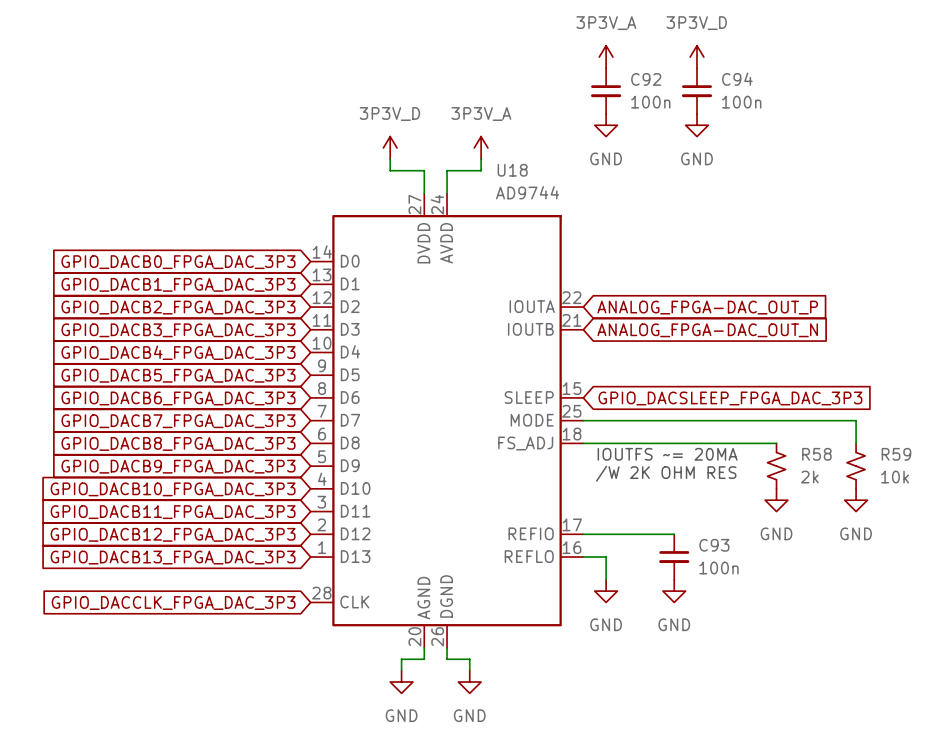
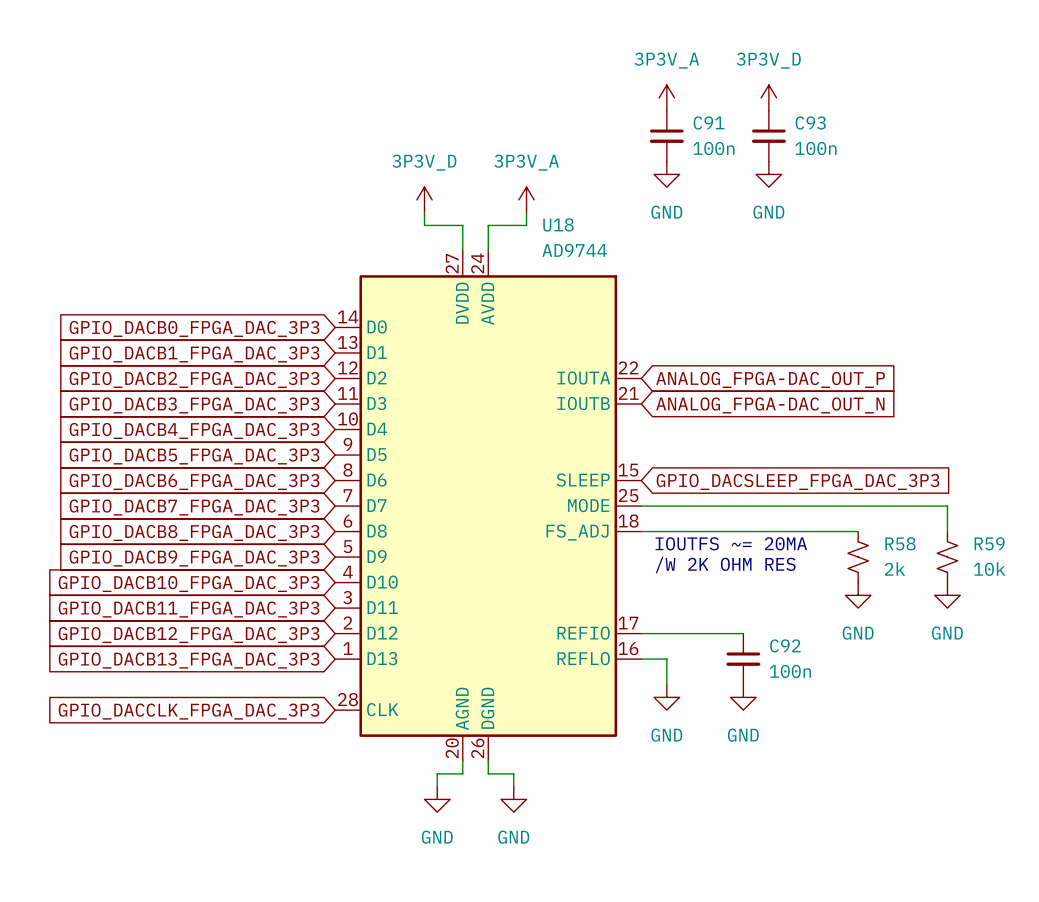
C92 name: C92 (646, 79) -> C91 (709, 122)
C94 name: C94 (737, 79) -> C93 (810, 122)
C93 name: C93 (714, 545) -> C92 (785, 645)

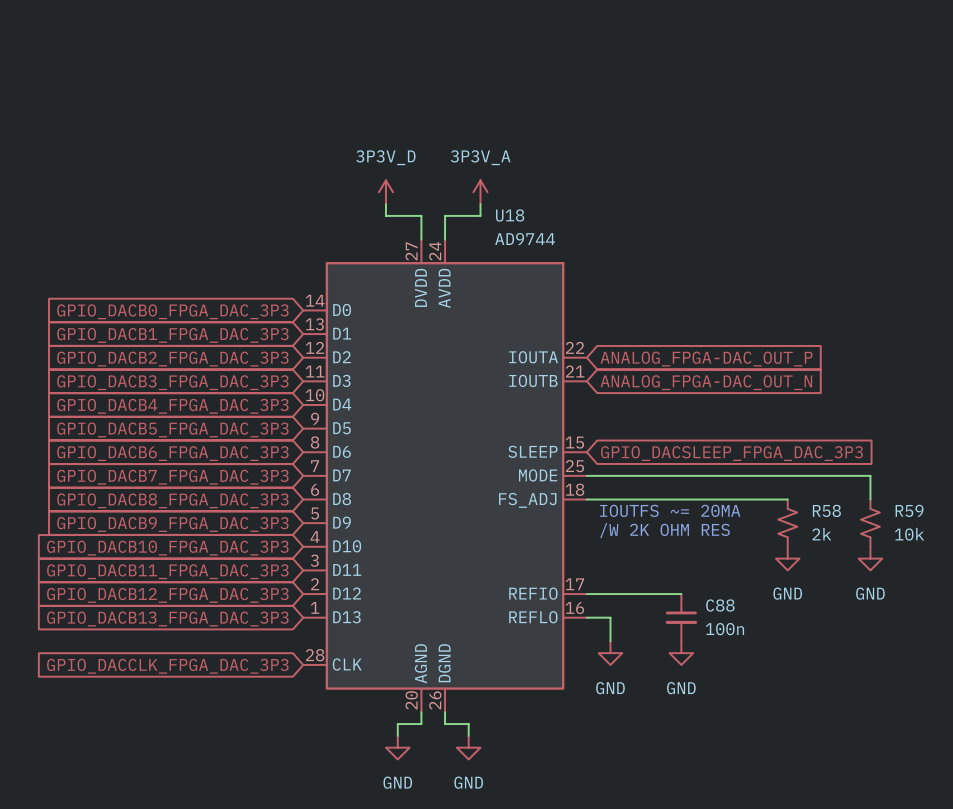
power symbol: 3P3V_A (666, 97) -> none
power symbol: 3P3V_D (768, 97) -> none
C91: 100n (666, 136) -> none
C93: 100n (768, 136) -> none
power symbol: GND (666, 174) -> none
power symbol: GND (768, 174) -> none
C92 name: C92 (785, 645) -> C88 (720, 605)

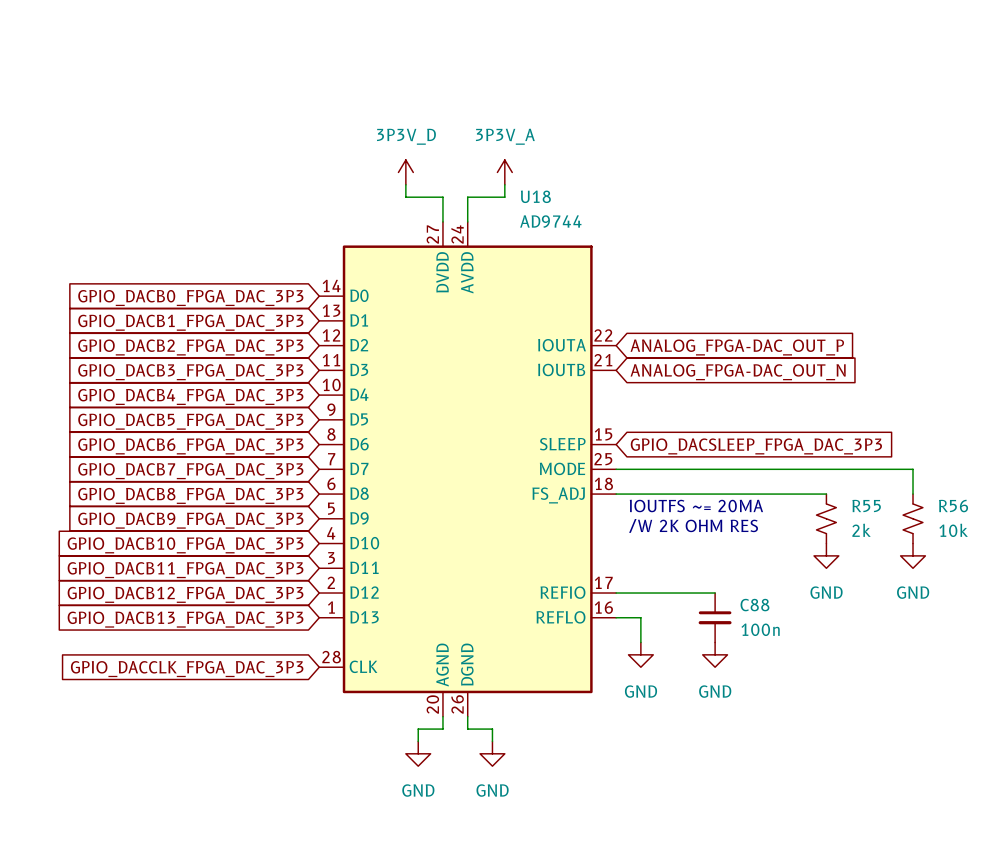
R58 name: R58 (826, 510) -> R55 (866, 505)
R59 name: R59 (909, 510) -> R56 (953, 506)

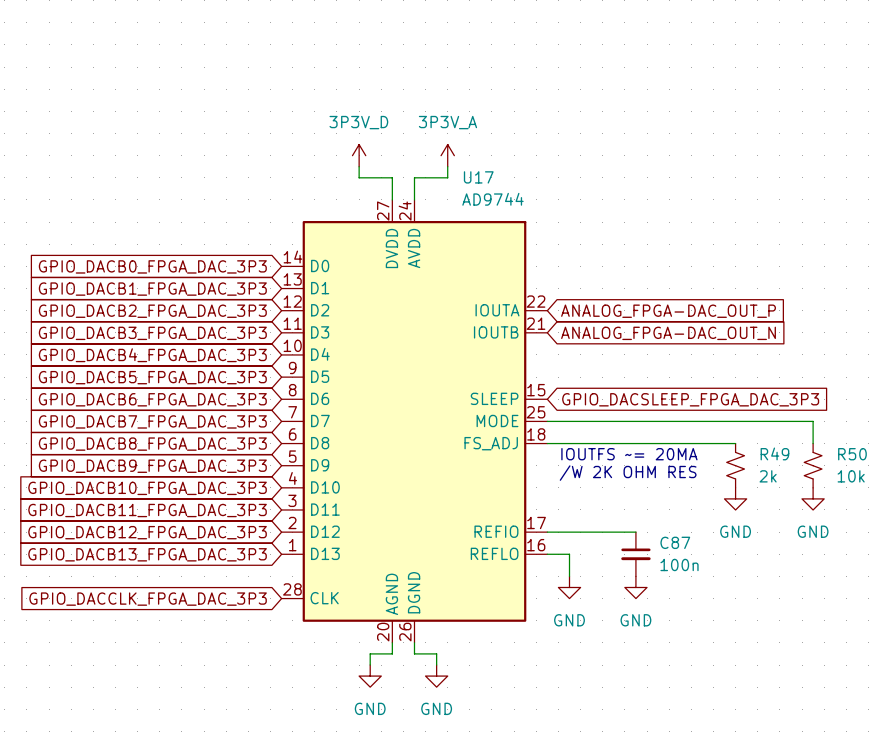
U18 name: U18 (535, 196) -> U17 (478, 177)
R55 name: R55 (866, 505) -> R49 (774, 453)
R56 name: R56 (953, 506) -> R50 (852, 454)
C88 name: C88 (754, 605) -> C87 (675, 542)

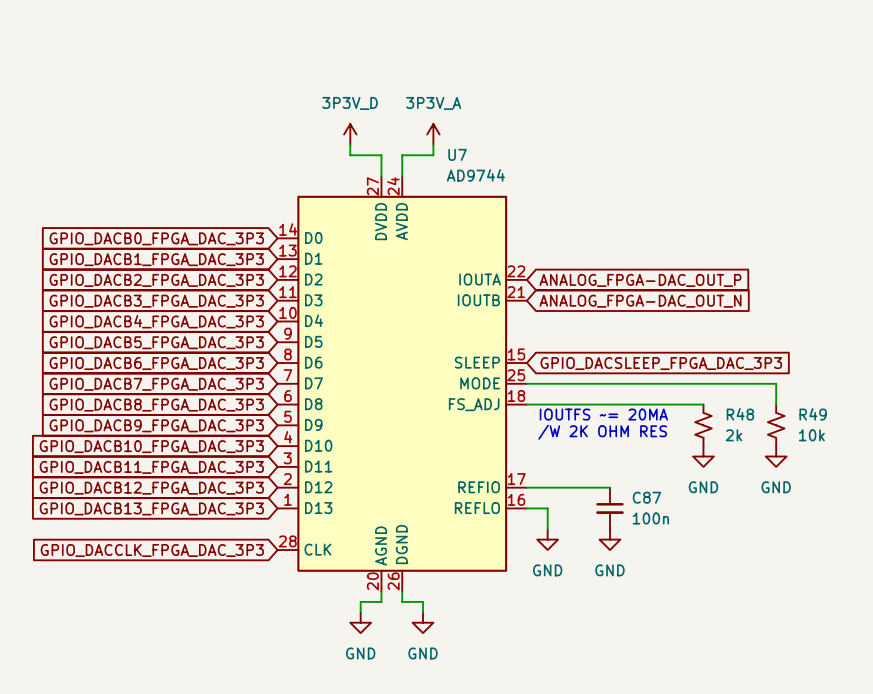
U17 name: U17 (478, 177) -> U7 (457, 154)
R49 name: R49 (774, 453) -> R48 (740, 414)
R50 name: R50 (852, 454) -> R49 (813, 414)

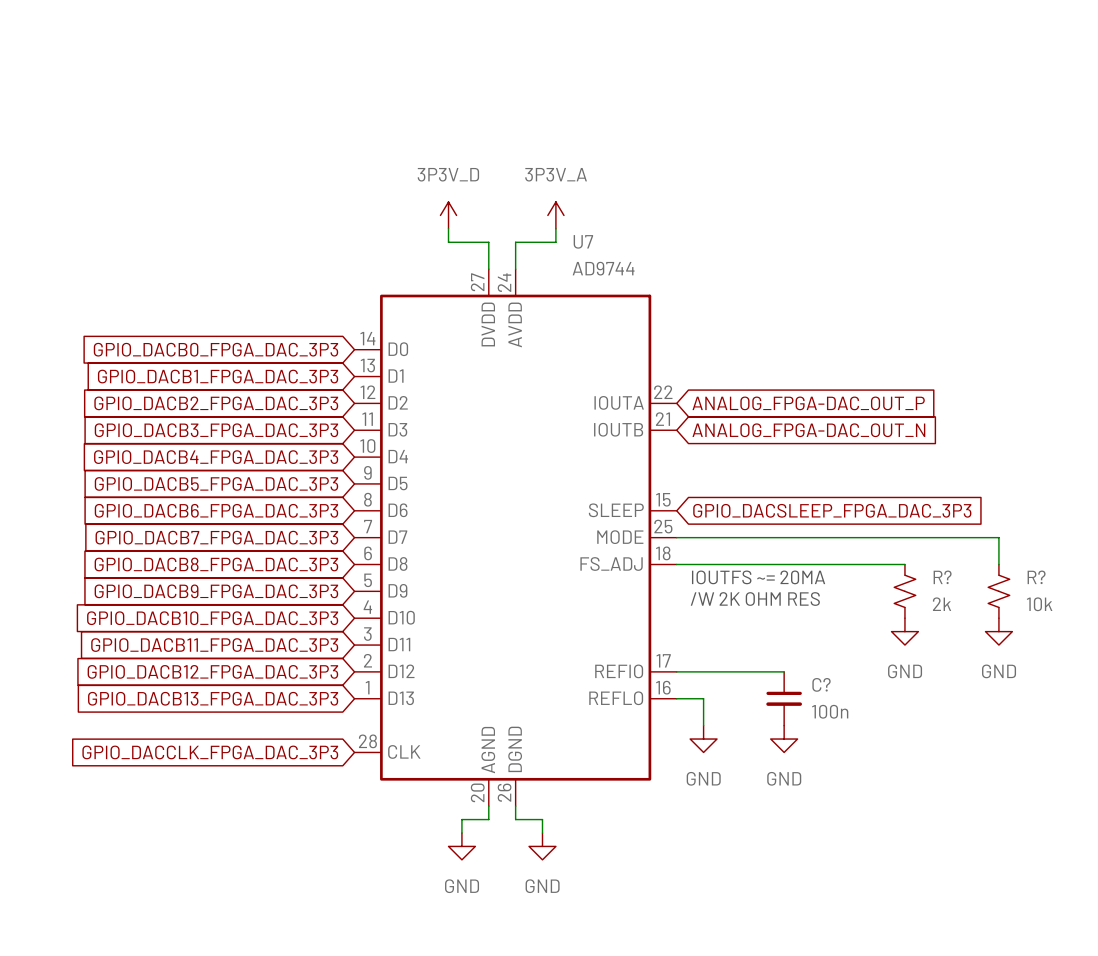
R48 name: R48 (740, 414) -> R? (942, 577)
R49 name: R49 (813, 414) -> R? (1036, 577)
C87 name: C87 (646, 497) -> C? (821, 684)

